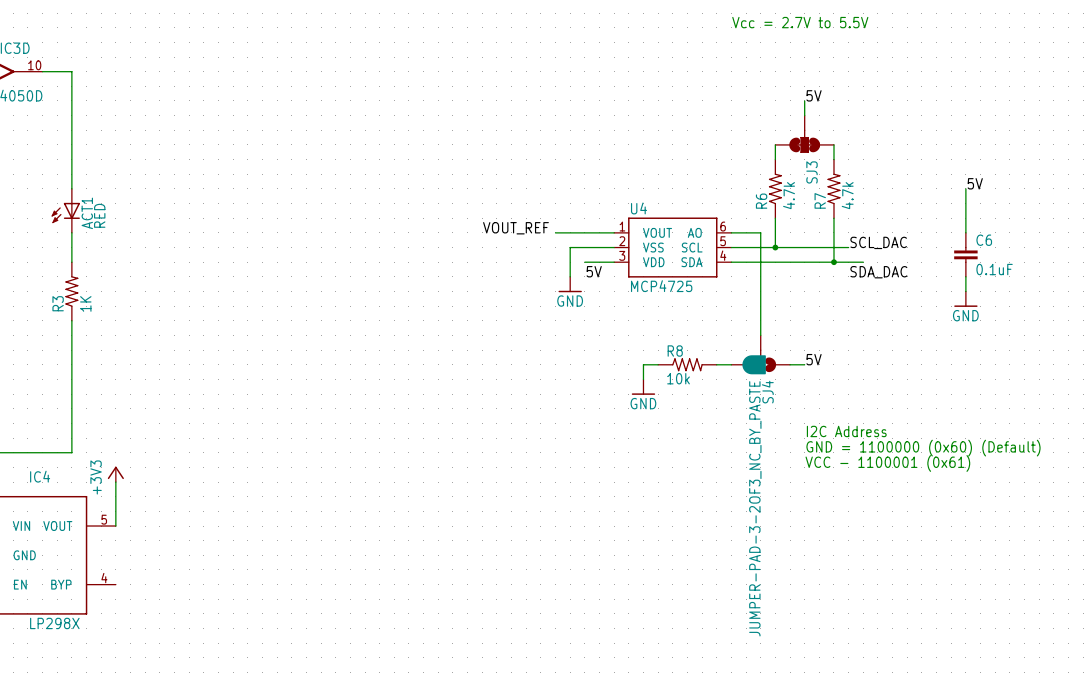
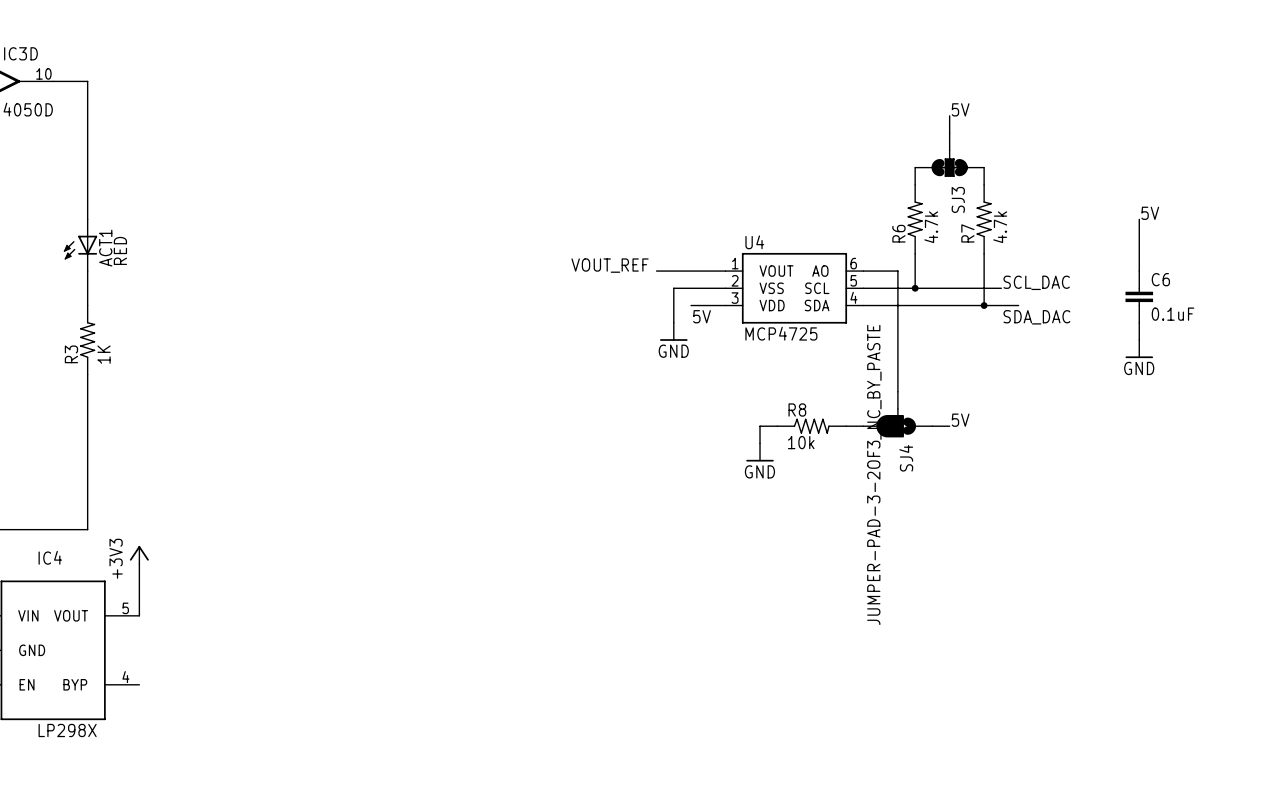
text: Vcc = 2.7V to 5.5V (800, 22) -> none
text: I2C Address (846, 431) -> none
text: GND = 1100000 (0x60) (Default) (923, 448) -> none
text: VCC - 1100001 (0x61) (887, 463) -> none
SJ4 value position: JUMPER-PAD-3-2OF3_NC_BY_PASTE (755, 508) -> JUMPER-PAD-3-2OF3_NC_BY_PASTE (874, 474)

